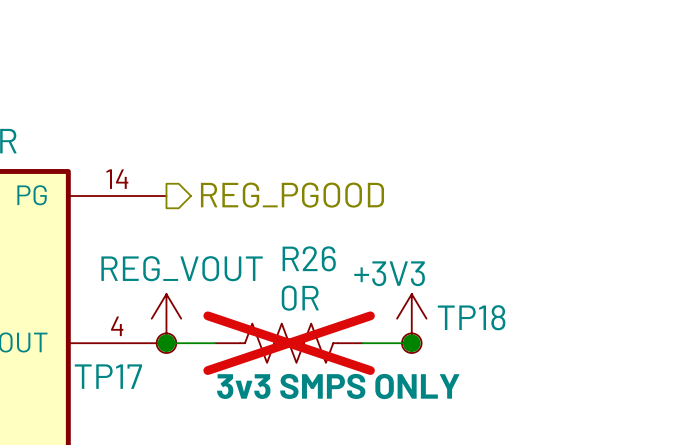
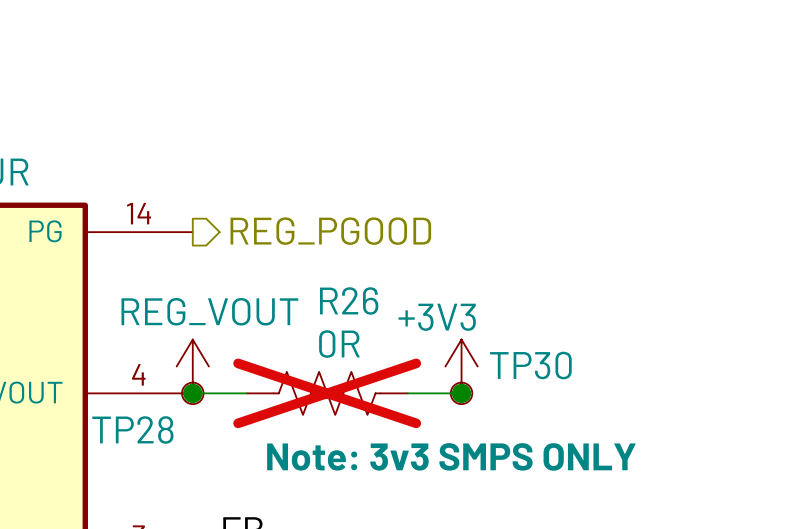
TP18 name: TP18 (471, 317) -> TP30 (530, 365)
TP17 name: TP17 (108, 376) -> TP28 (132, 429)
R26 text: 3v3 SMPS ONLY (338, 386) -> none
R26 text: none -> Note: 3v3 SMPS ONLY (451, 456)

